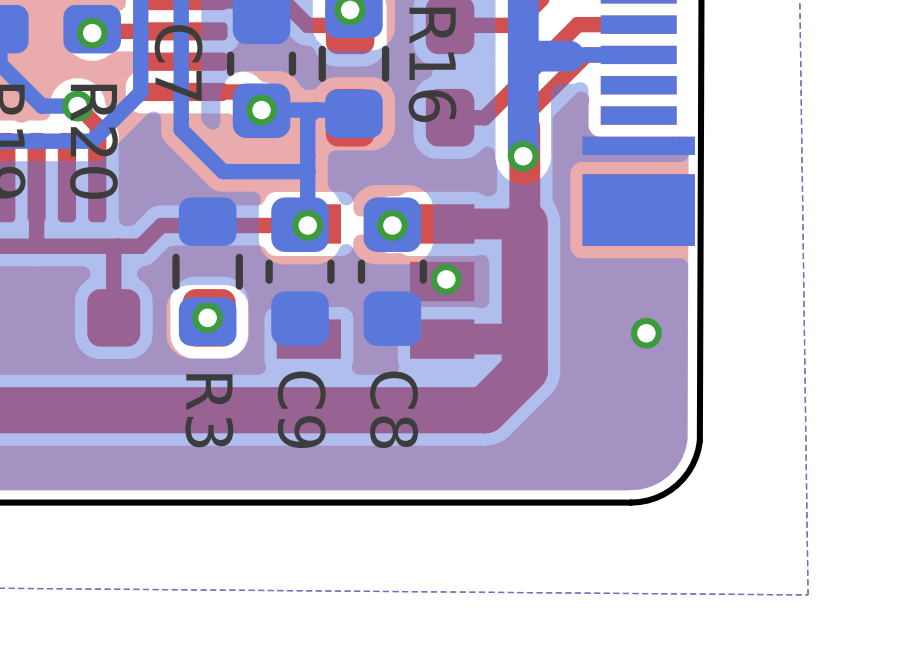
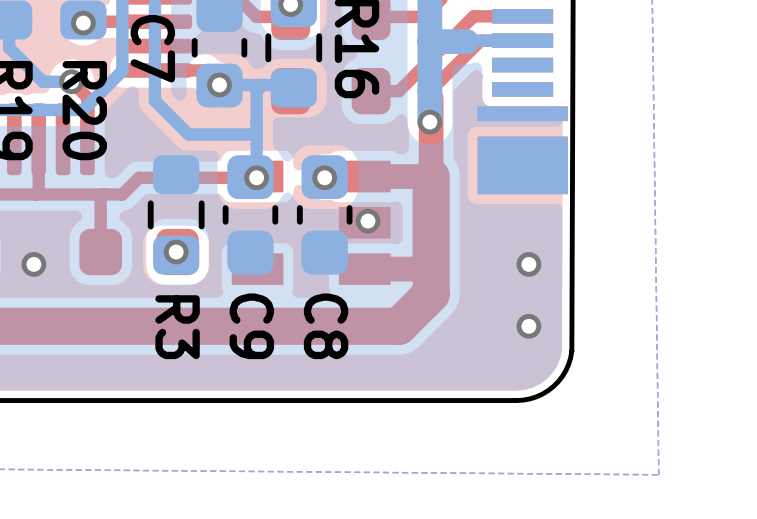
via: none -> (33, 264)
via: none -> (528, 326)

